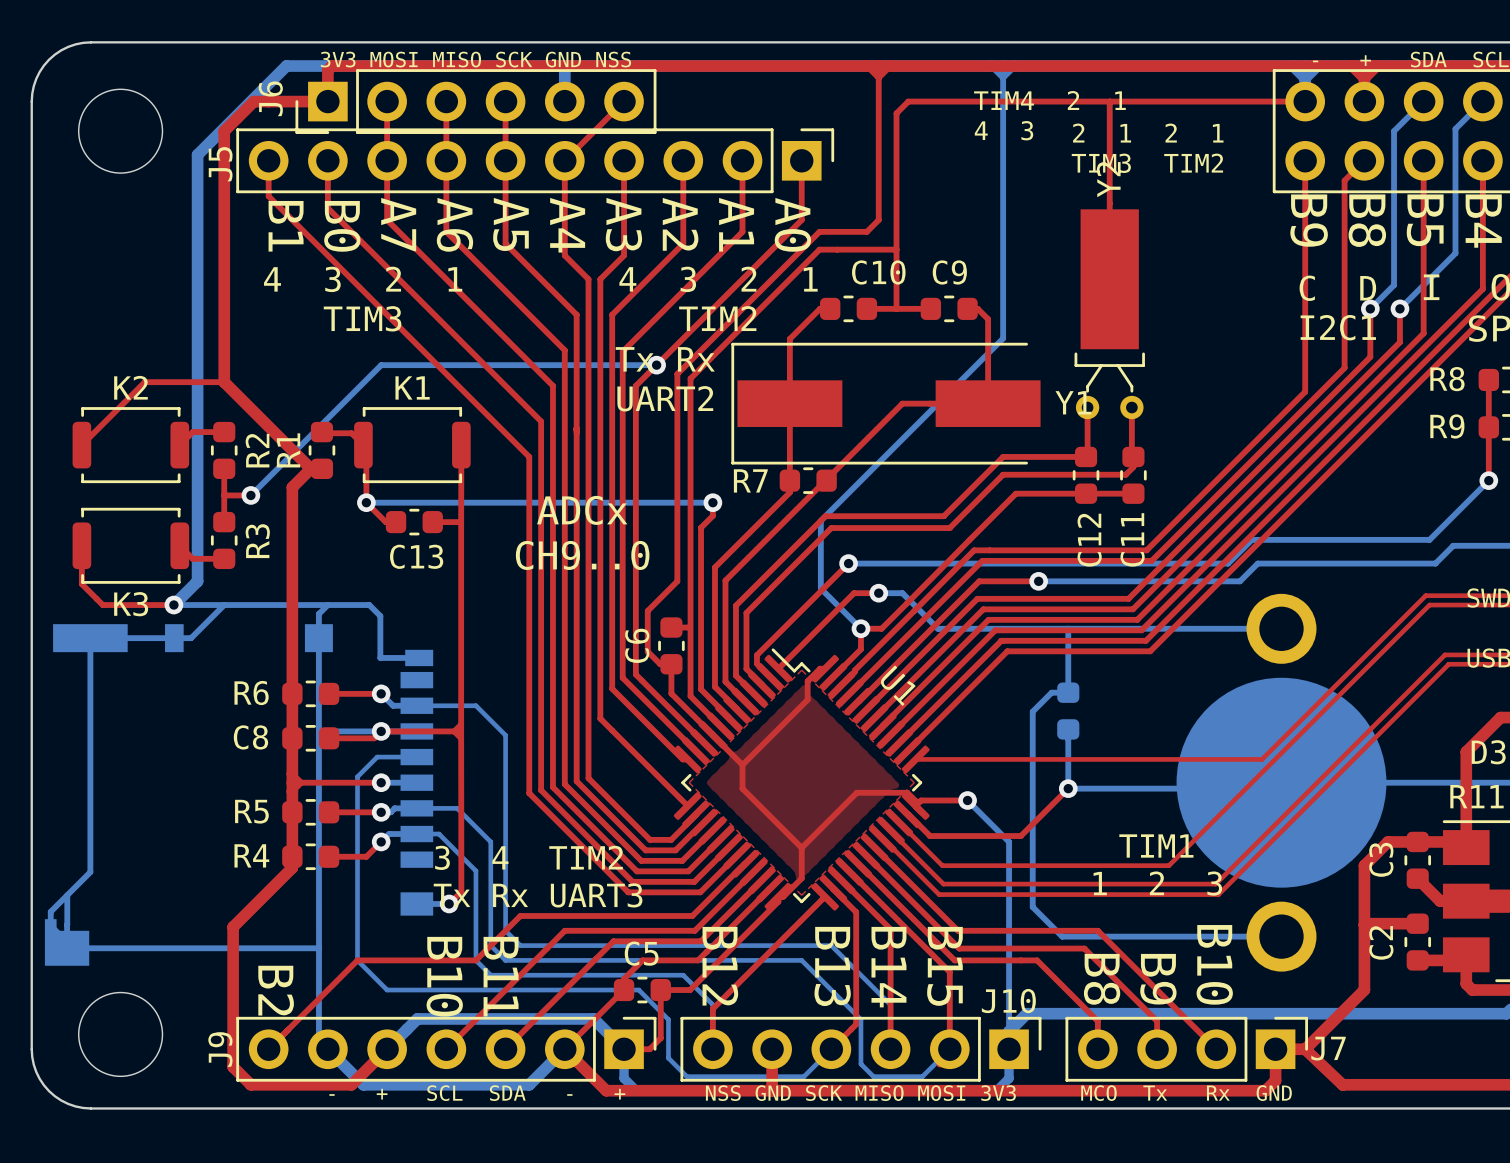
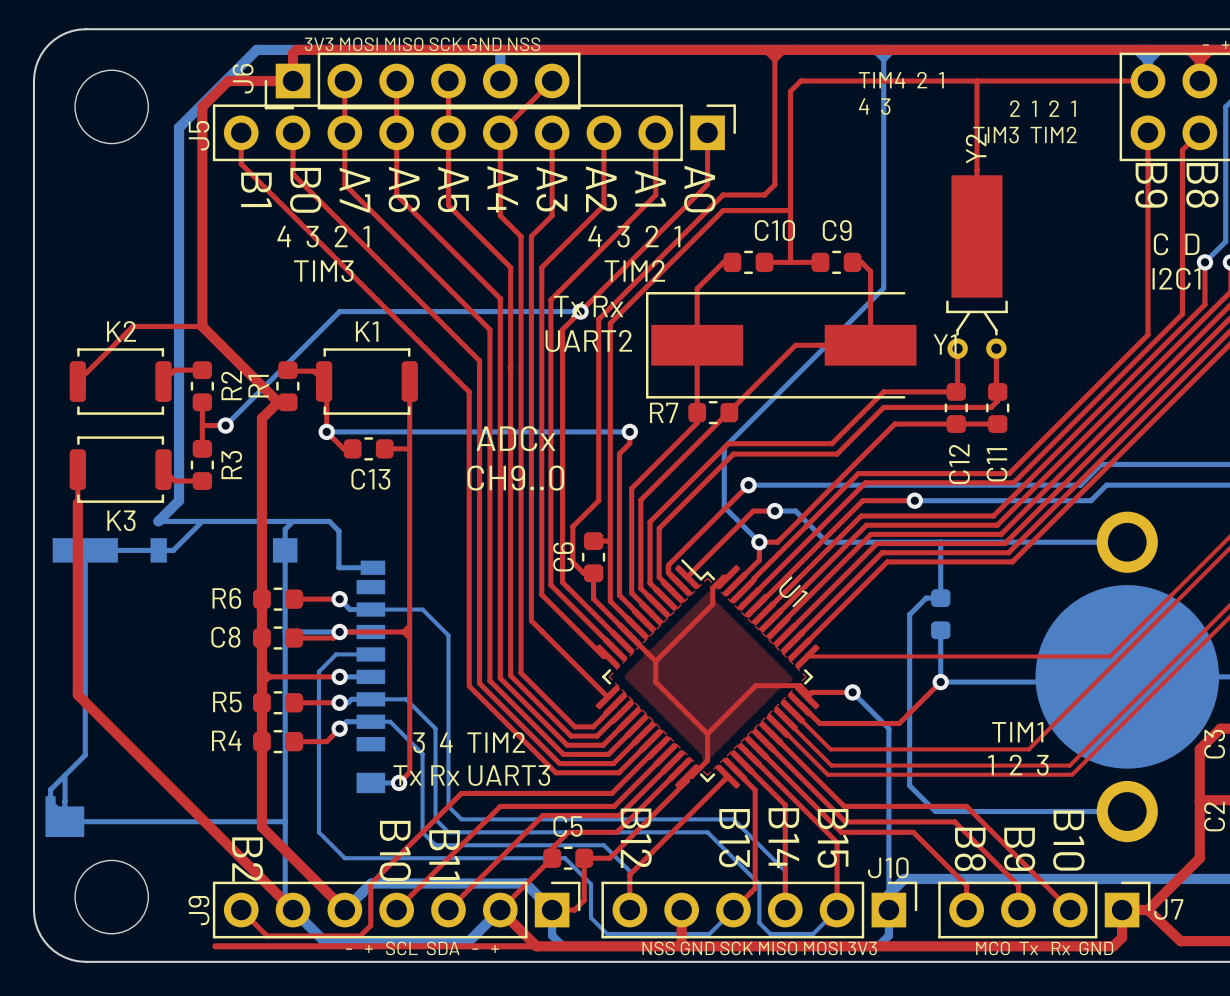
top track: (81, 584) (102, 605) (173, 605) -> (77, 503) (77, 694) (293, 910)
via: (173, 605) -> none
top track: (292, 867) (233, 927) (233, 1067) (250, 1084) (351, 1084) (387, 1049) -> (261, 751) (261, 827) (344, 910)
top track: (475, 960) (357, 960) (268, 1049) -> (422, 832) (370, 884) (370, 925) (360, 935) (267, 935) (241, 910)
top track: none -> (215, 946) (536, 946)

